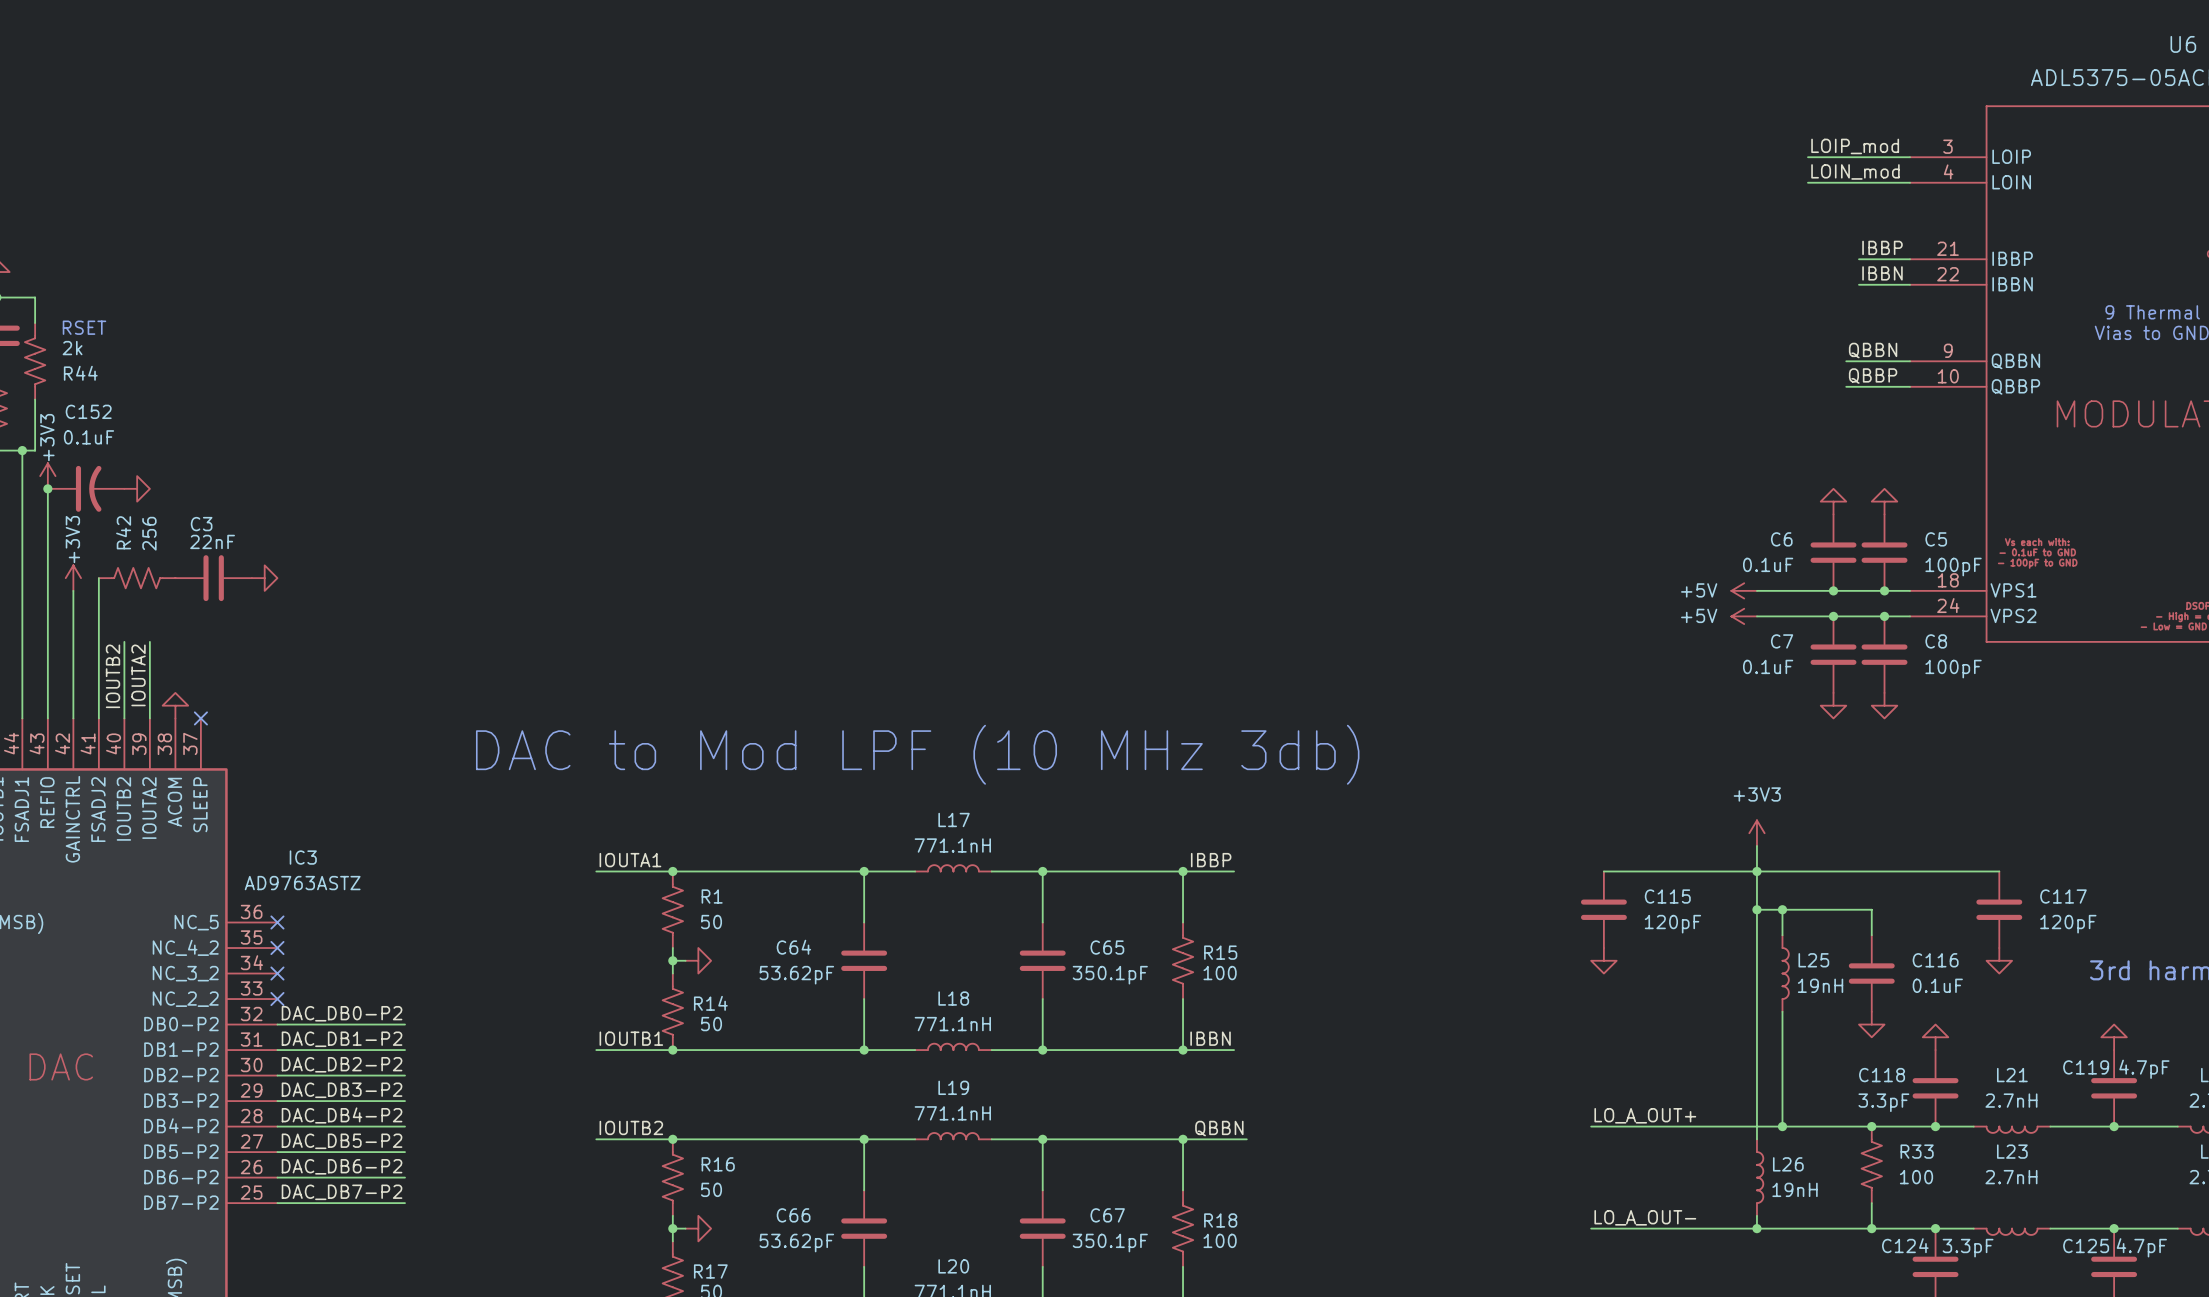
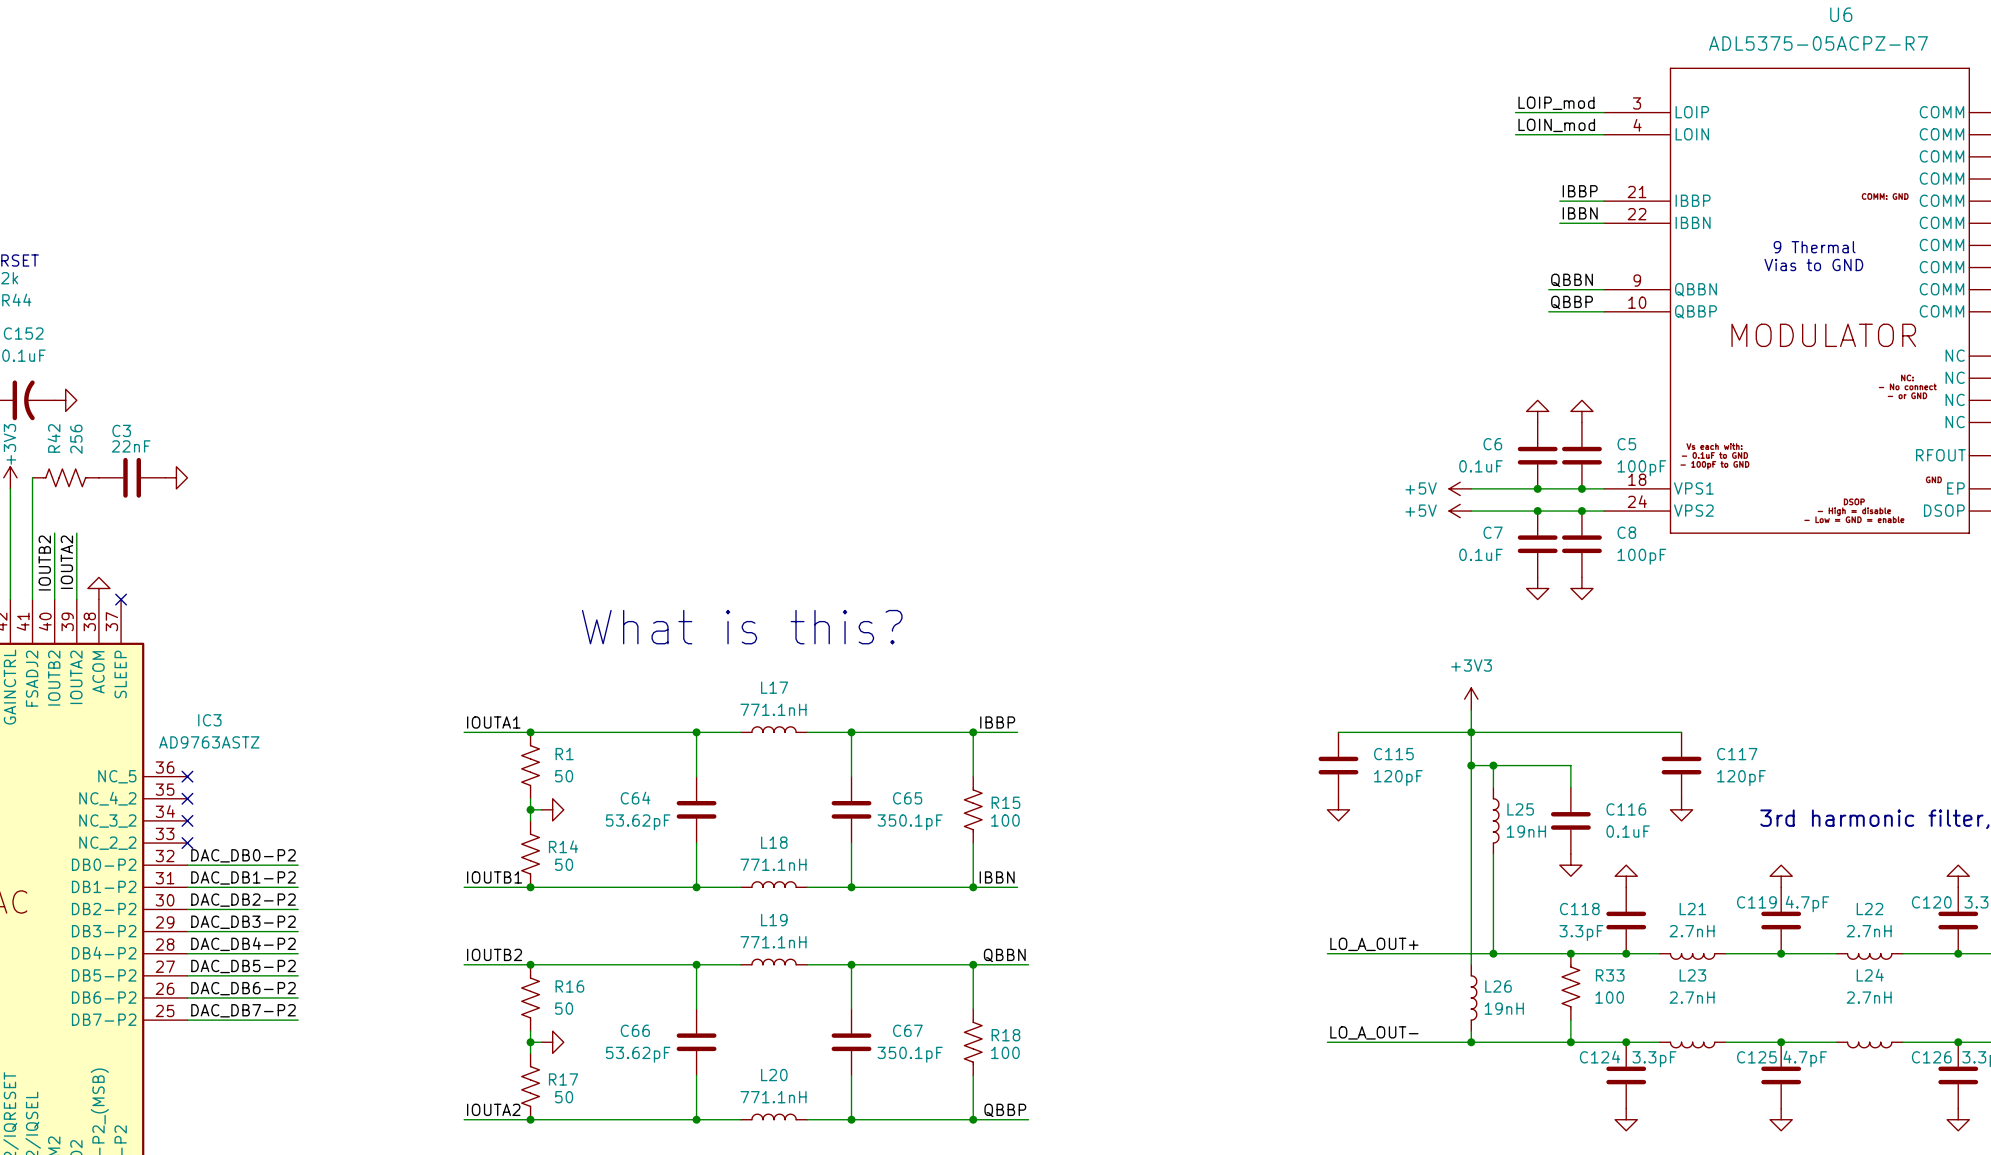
text: DAC to Mod LPF (10 MHz 3db) (917, 754) -> What is this? (742, 627)

